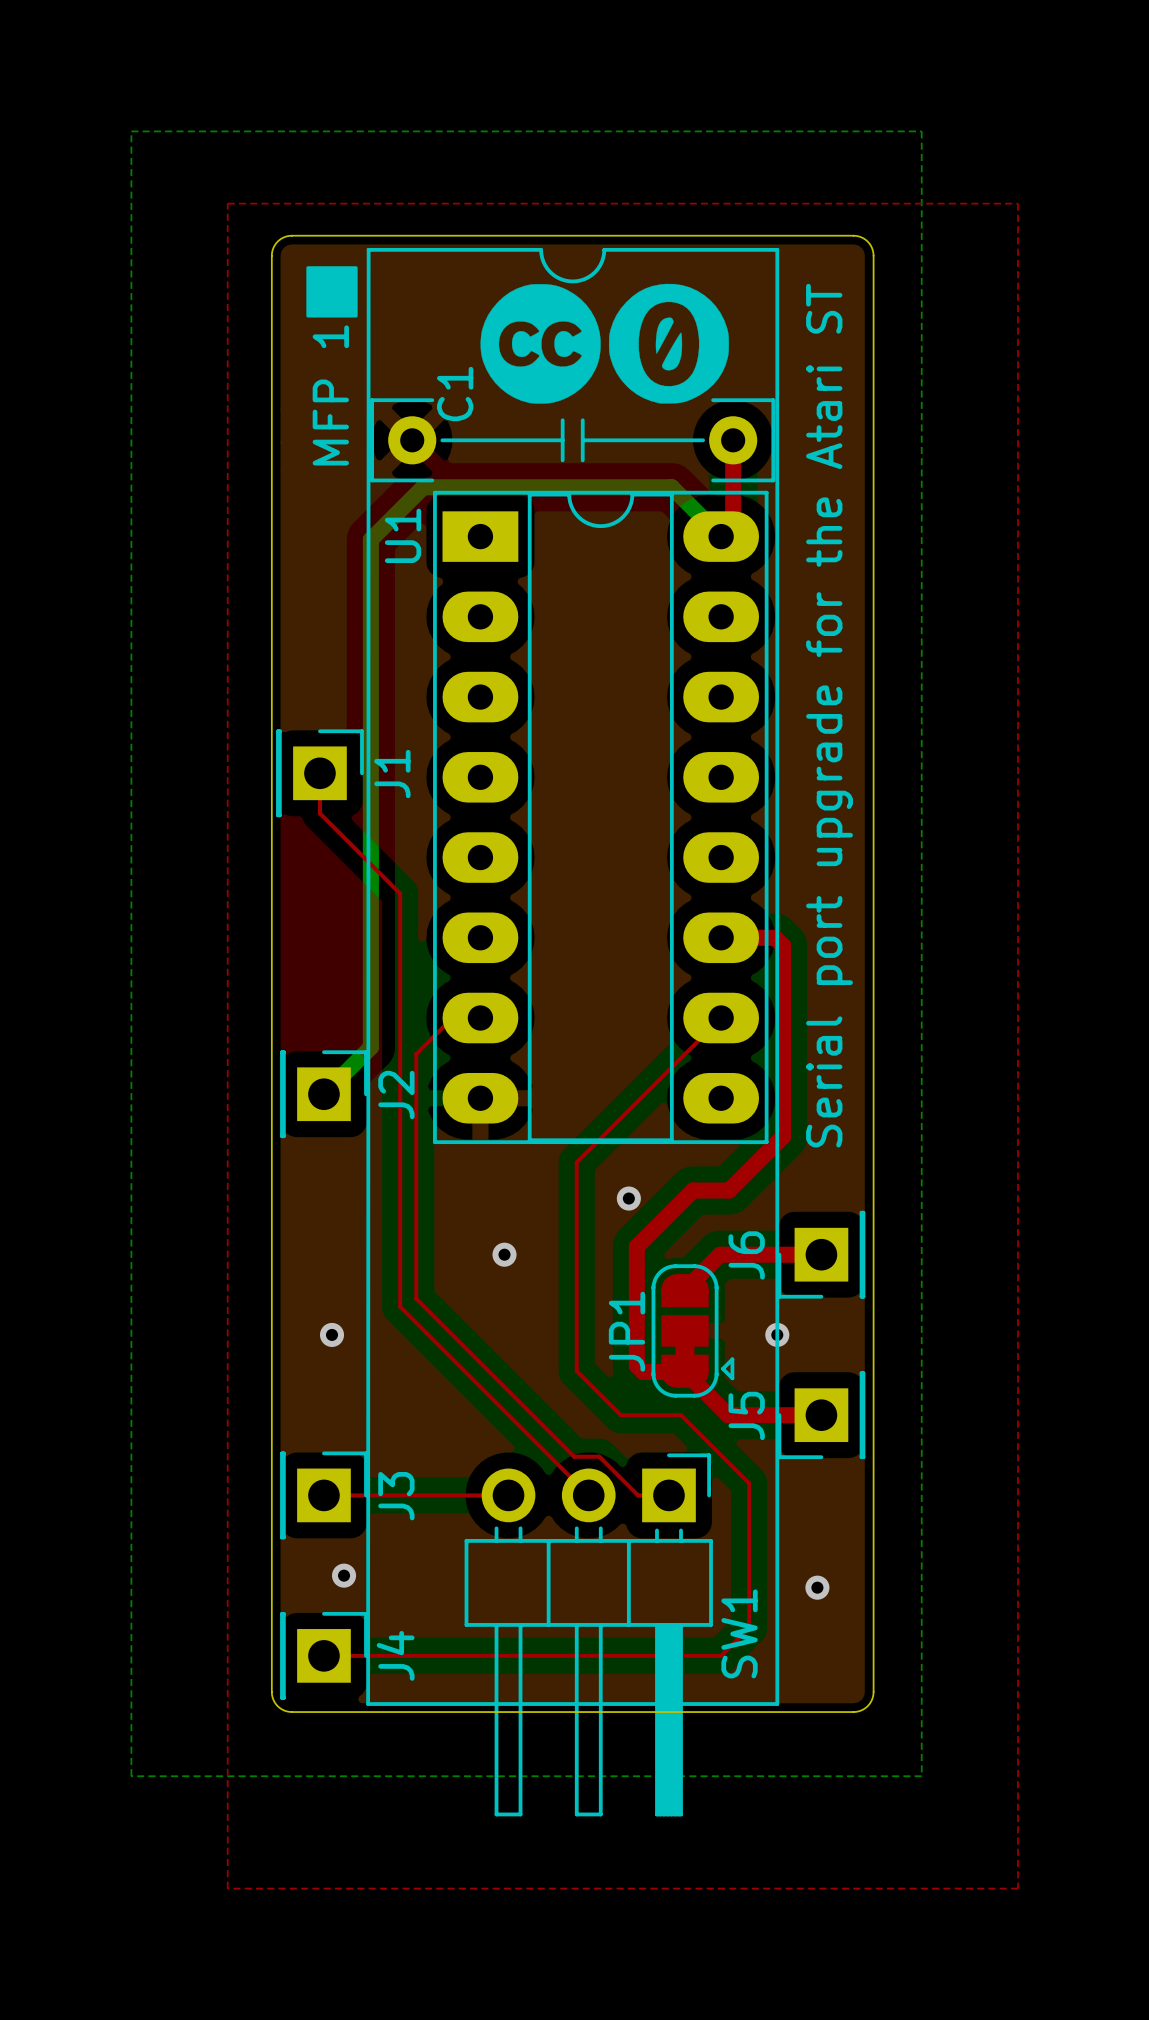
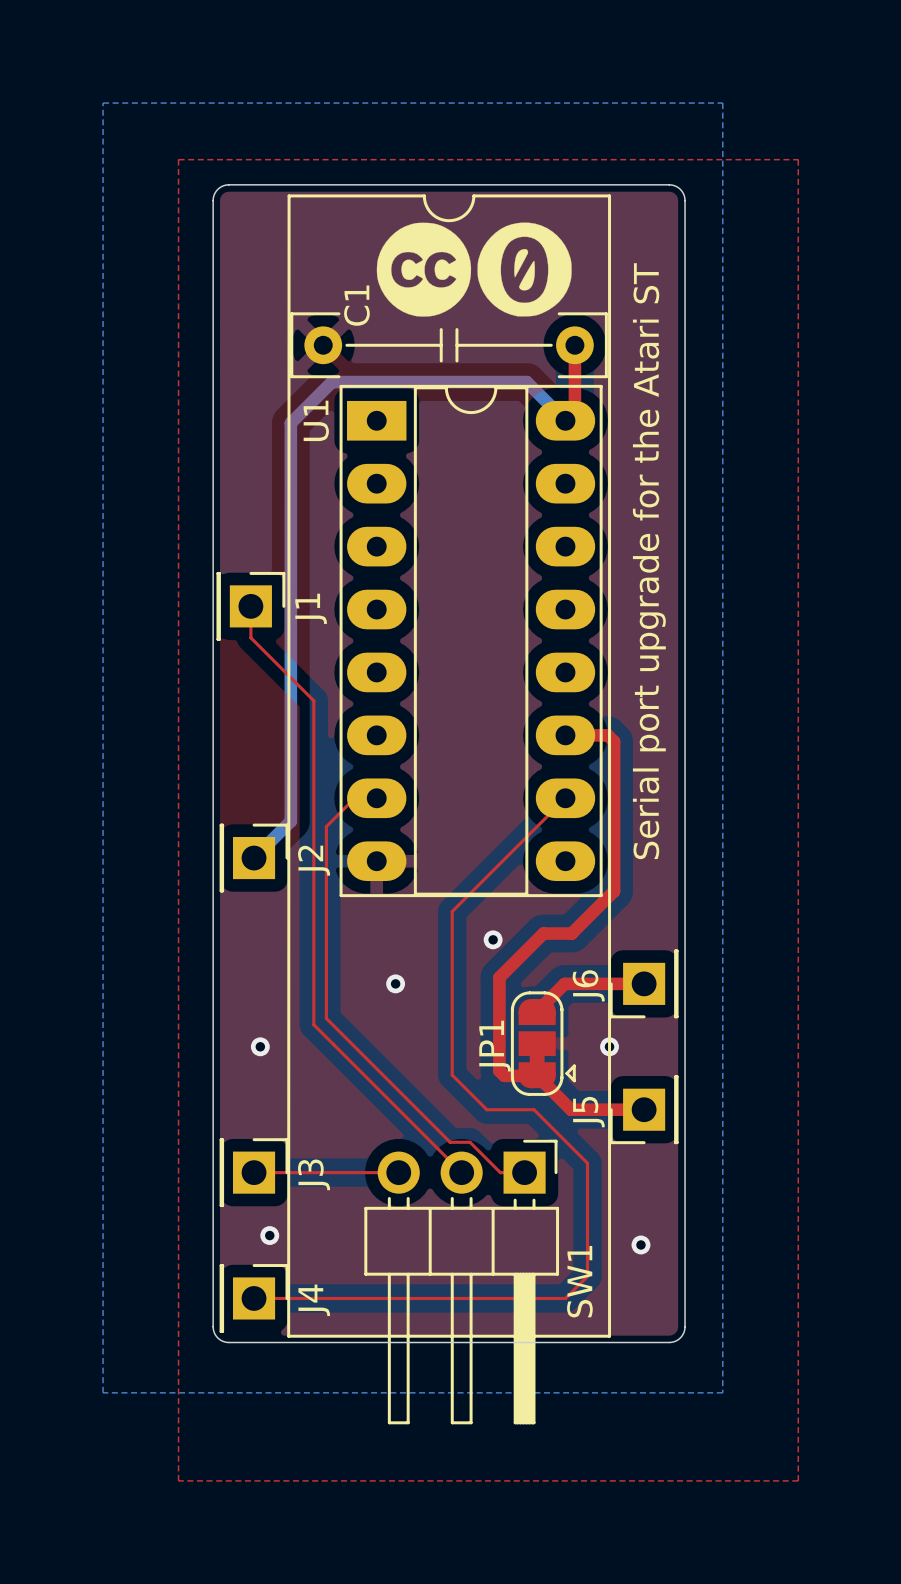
drawing: [306, 266, 358, 318] -> none
text: MFP 1 (330, 395) -> none

